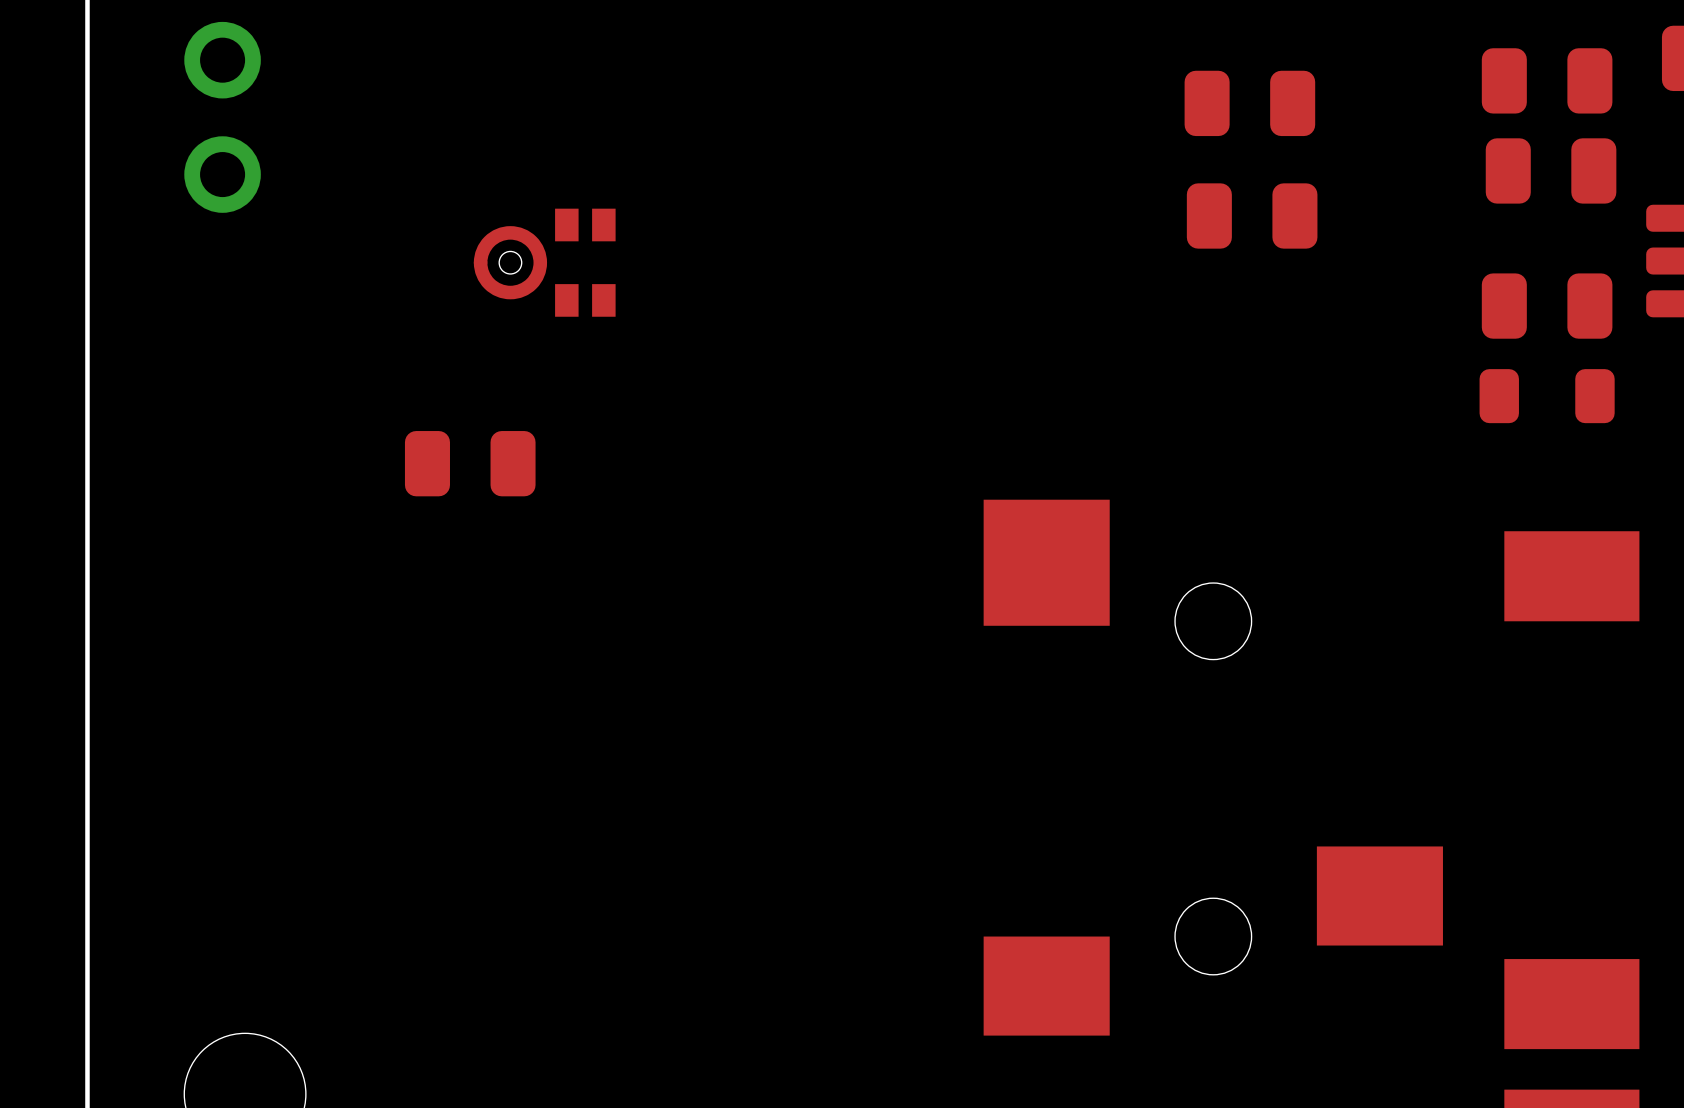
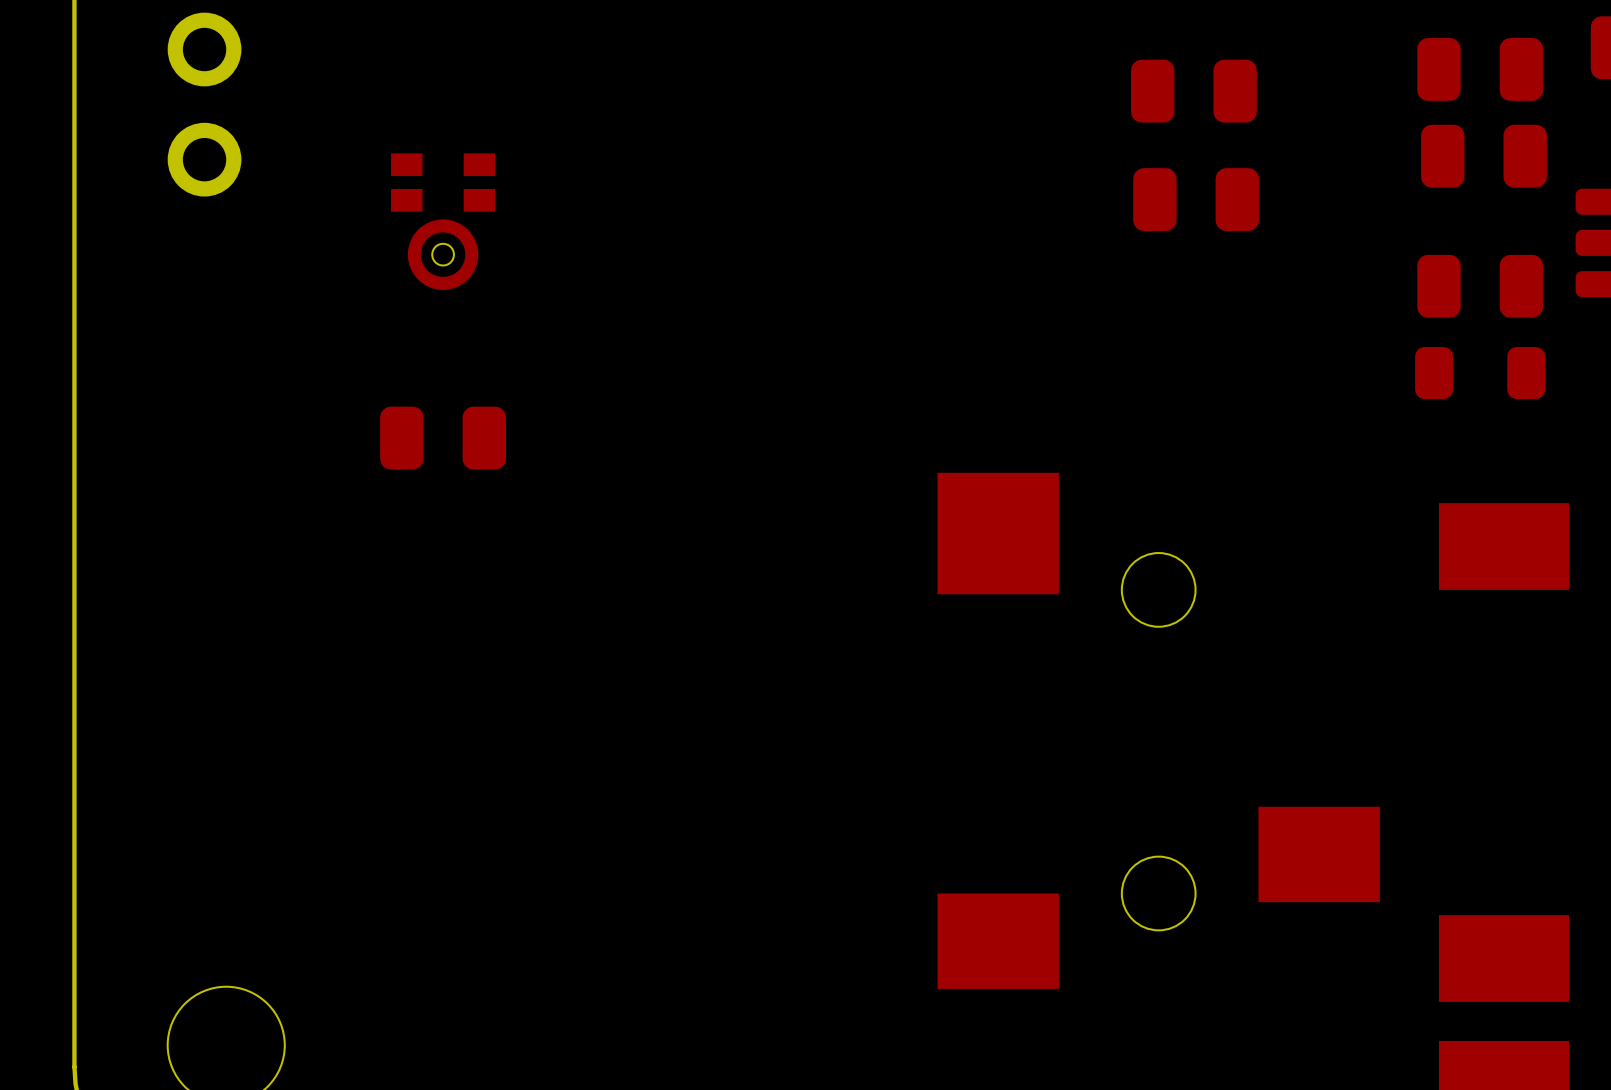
part rotation: 0° (544, 262) -> 90° counterclockwise (443, 221)

